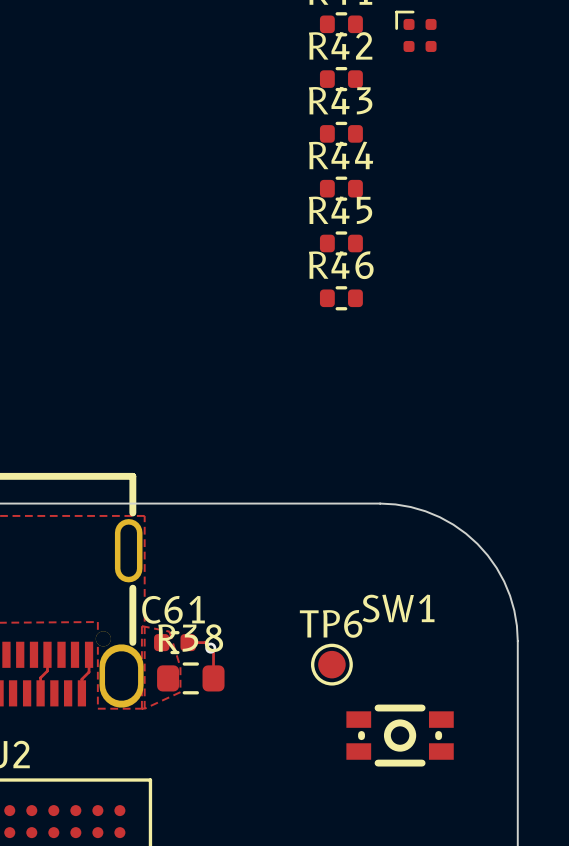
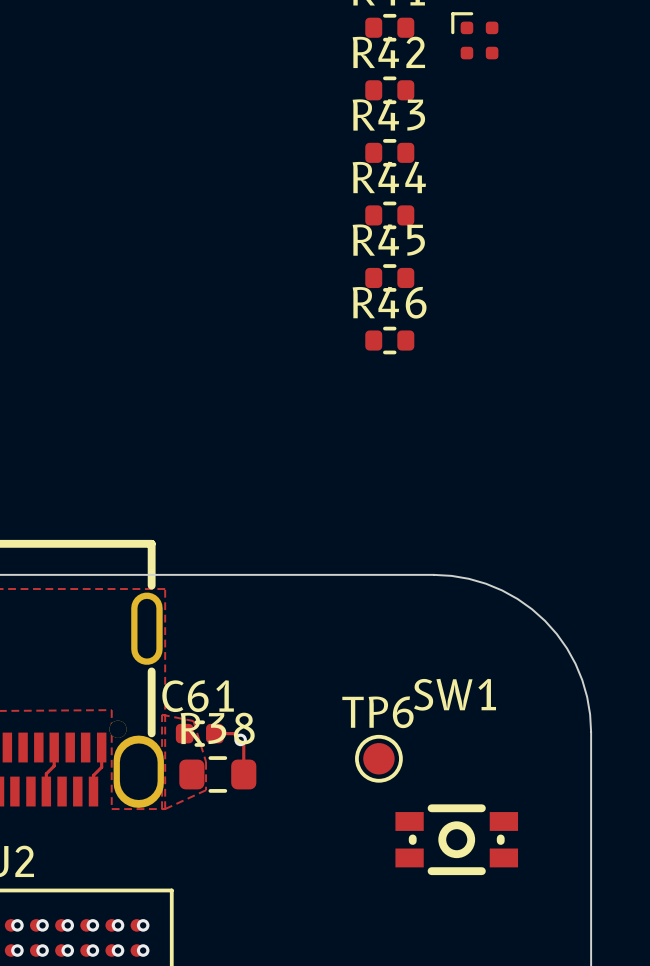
via: none -> (17, 925)
via: none -> (42, 925)
via: none -> (67, 925)
via: none -> (92, 925)
via: none -> (118, 925)
via: none -> (143, 925)
via: none -> (17, 950)
via: none -> (42, 950)
via: none -> (67, 950)
via: none -> (92, 950)
via: none -> (118, 950)
via: none -> (143, 950)

